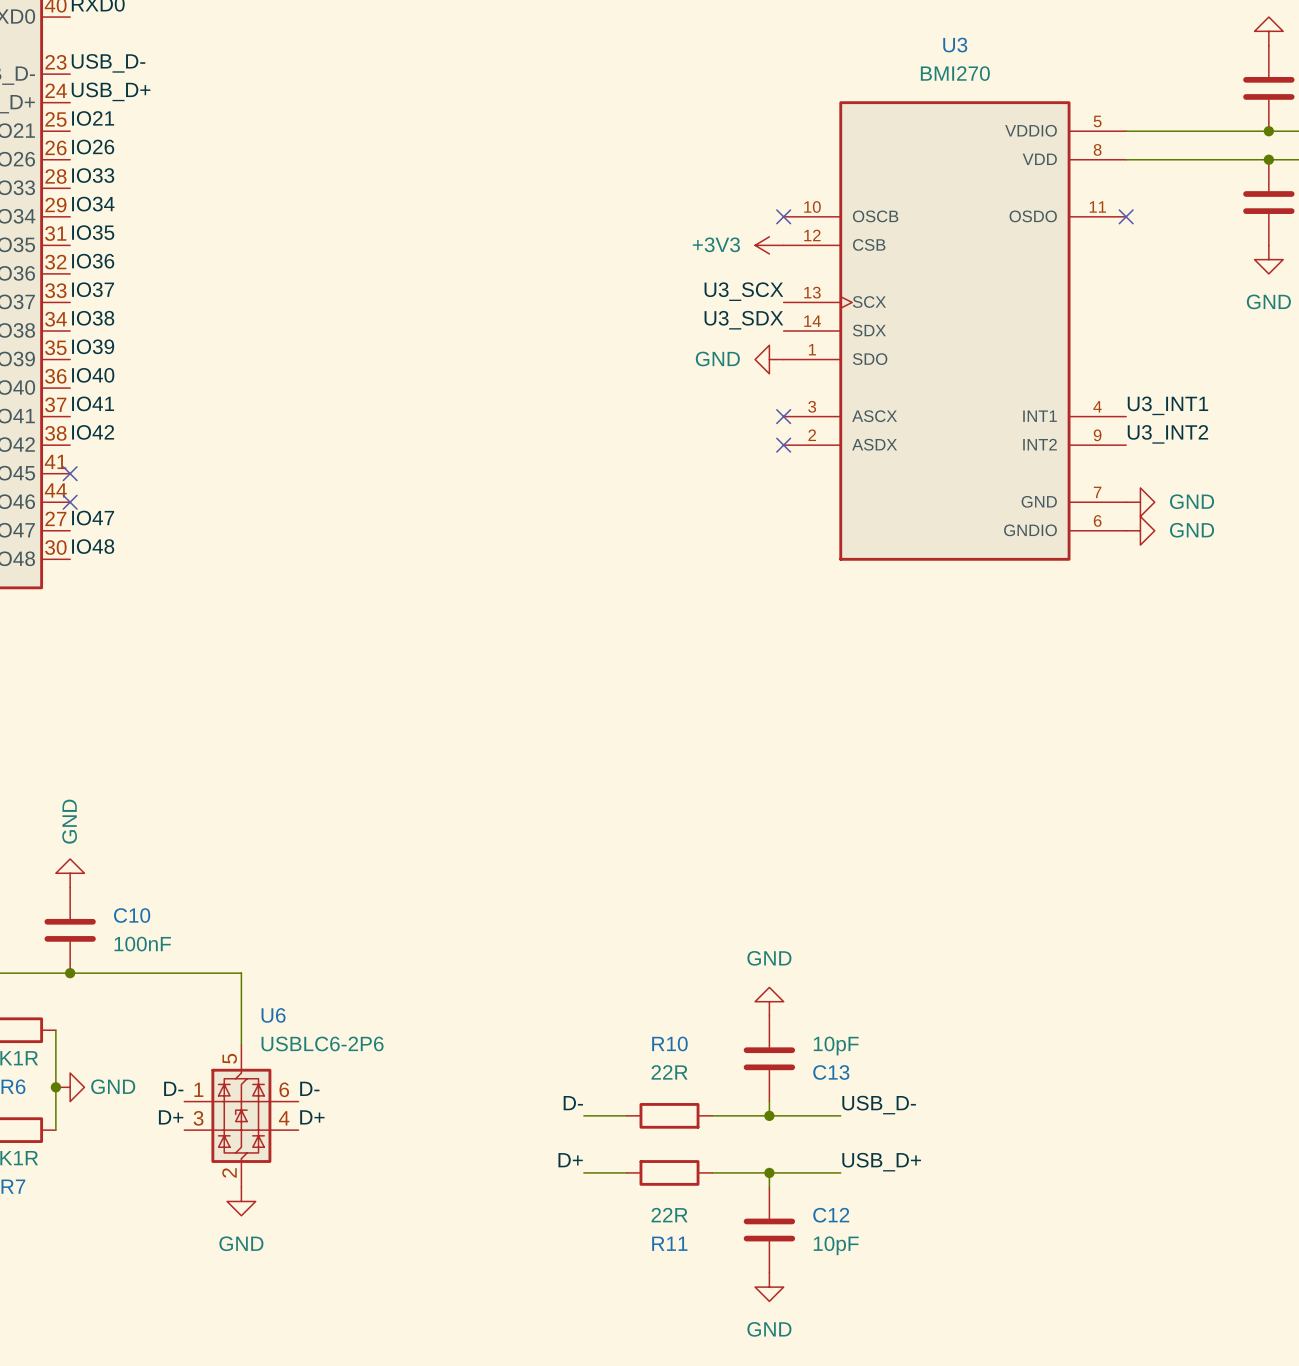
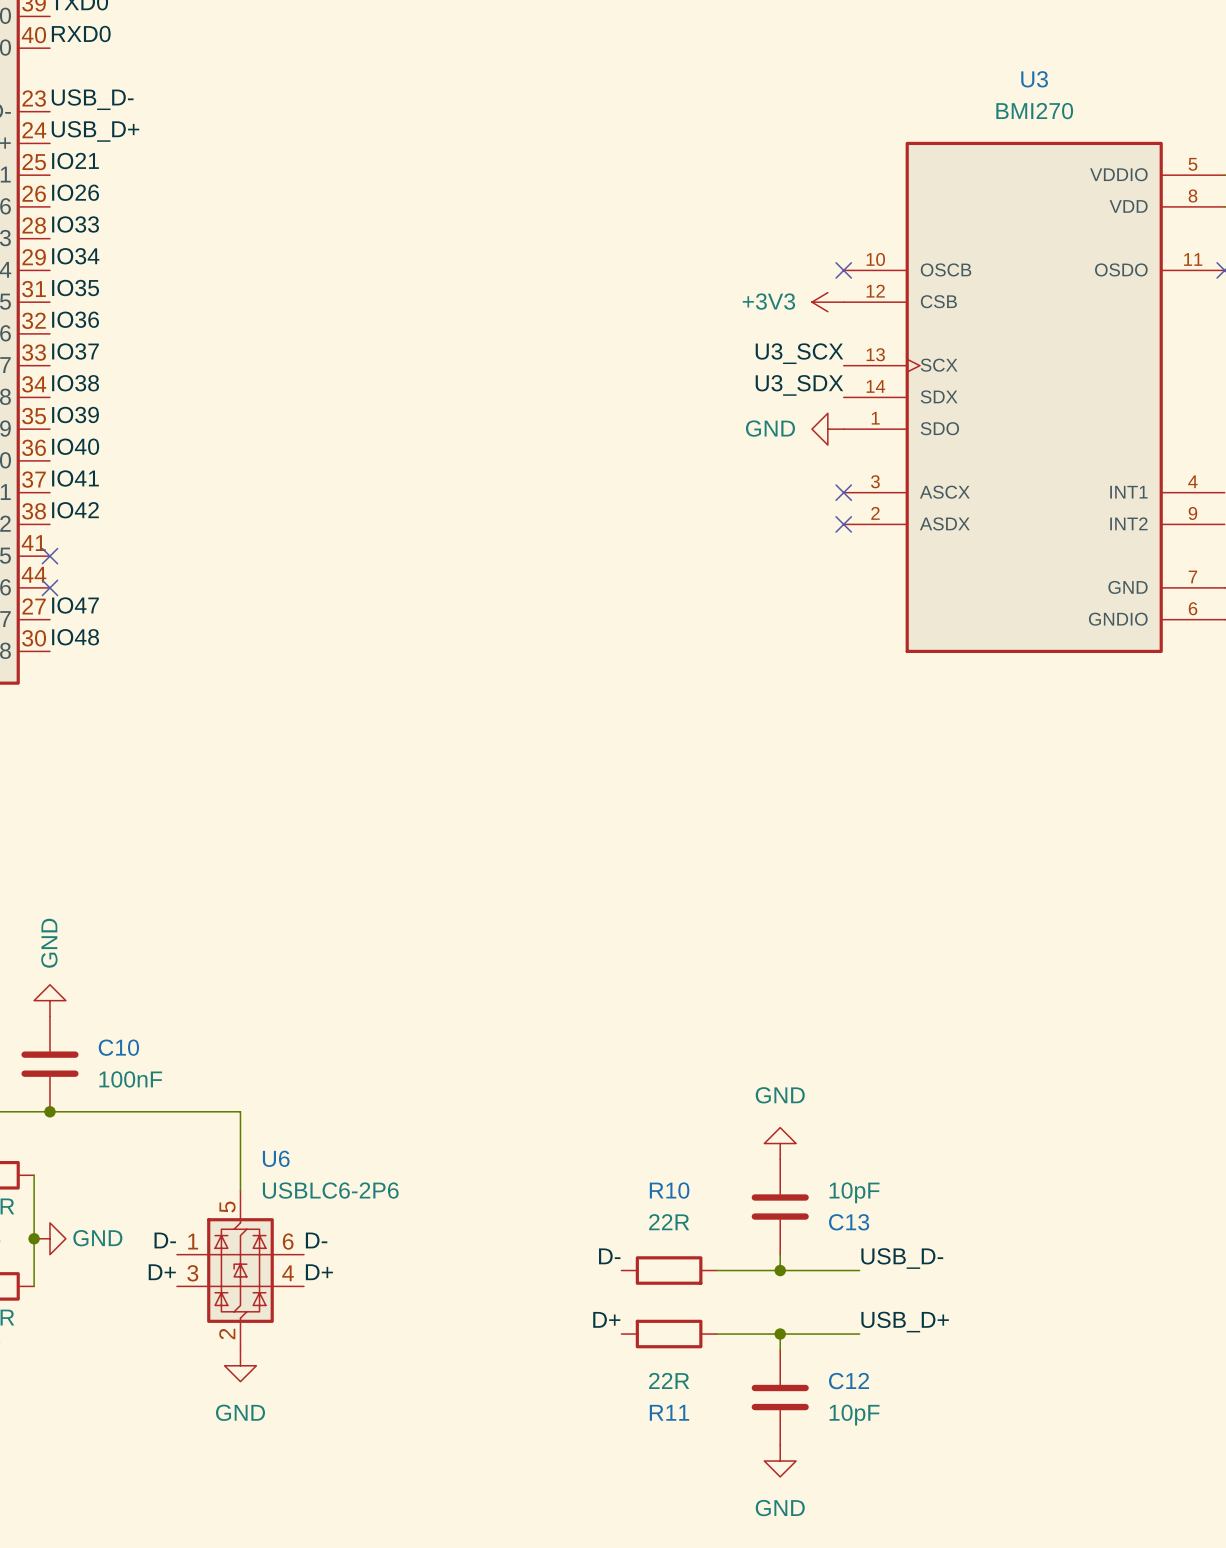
power symbol position: GND (769, 1001) -> GND (780, 1143)
C13 position: (769, 1058) -> (780, 1207)
wire: (769, 1101) (769, 1115) -> (780, 1254) (780, 1270)
label position: USB_D- (879, 1105) -> USB_D- (902, 1258)
wire: (583, 1115) (626, 1115) -> (716, 1270) (764, 1270)
R10 position: (669, 1115) -> (669, 1270)
junction: none -> (780, 1270)
junction: (769, 1115) -> none
wire: (797, 1115) (840, 1115) -> none
label position: USB_D+ (881, 1162) -> USB_D+ (905, 1322)
wire: (583, 1172) (626, 1172) -> (716, 1334) (764, 1334)
R11 position: (669, 1172) -> (669, 1334)
junction: none -> (780, 1334)
wire: (769, 1172) (769, 1187) -> (780, 1334) (780, 1349)
junction: (769, 1172) -> none
wire: (797, 1172) (840, 1172) -> none
C12 position: (769, 1230) -> (780, 1397)
power symbol position: GND (769, 1287) -> GND (780, 1461)

